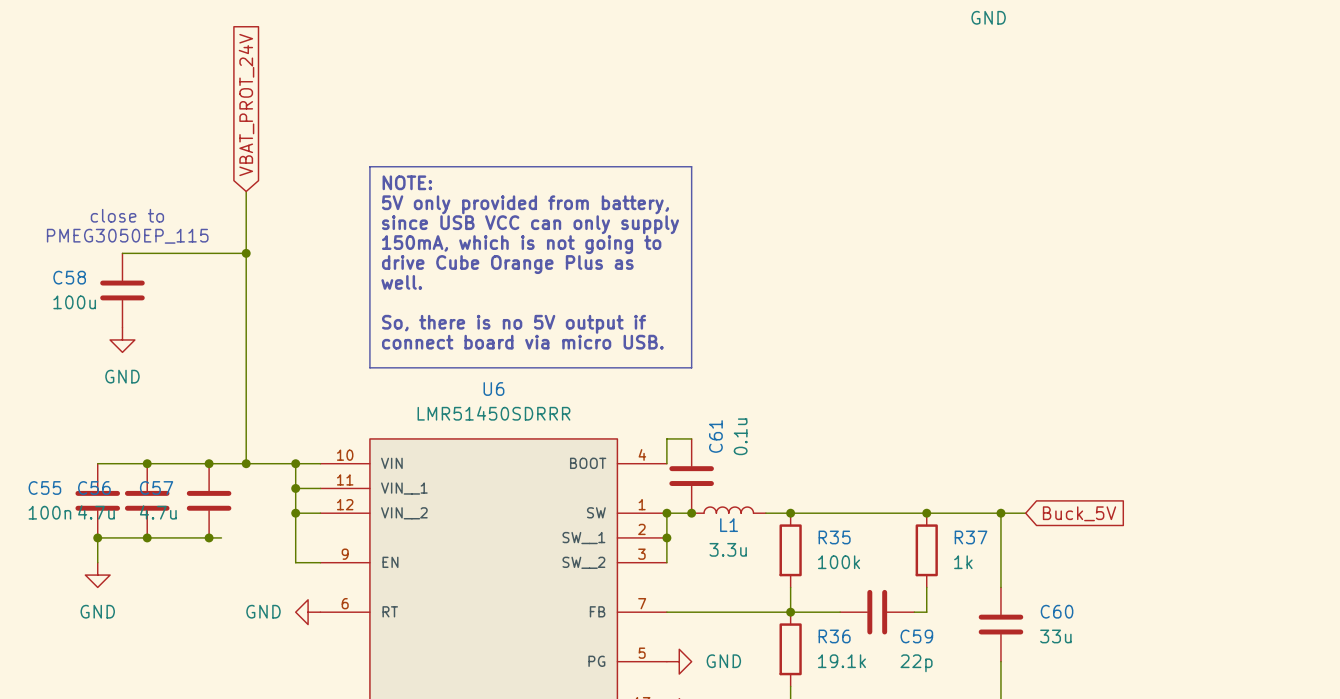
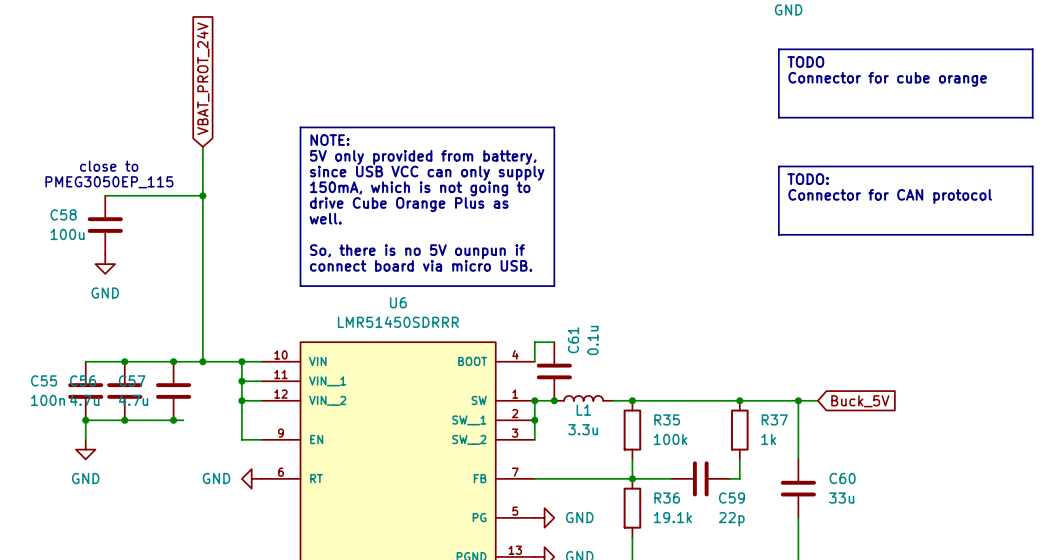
line: none -> (778, 49) (778, 117) (1032, 117) (1032, 49) (778, 49)
text: none -> TODO (805, 62)
text: none -> Connector for cube orange (887, 79)
line: none -> (778, 166) (1032, 166) (1032, 234) (778, 234) (778, 166)
text: none -> TODO: (808, 179)
text: none -> Connector for CAN protocol (890, 196)
text: So, there is no 5V output if (514, 324) -> So, there is no 5V ounpun if (417, 251)

